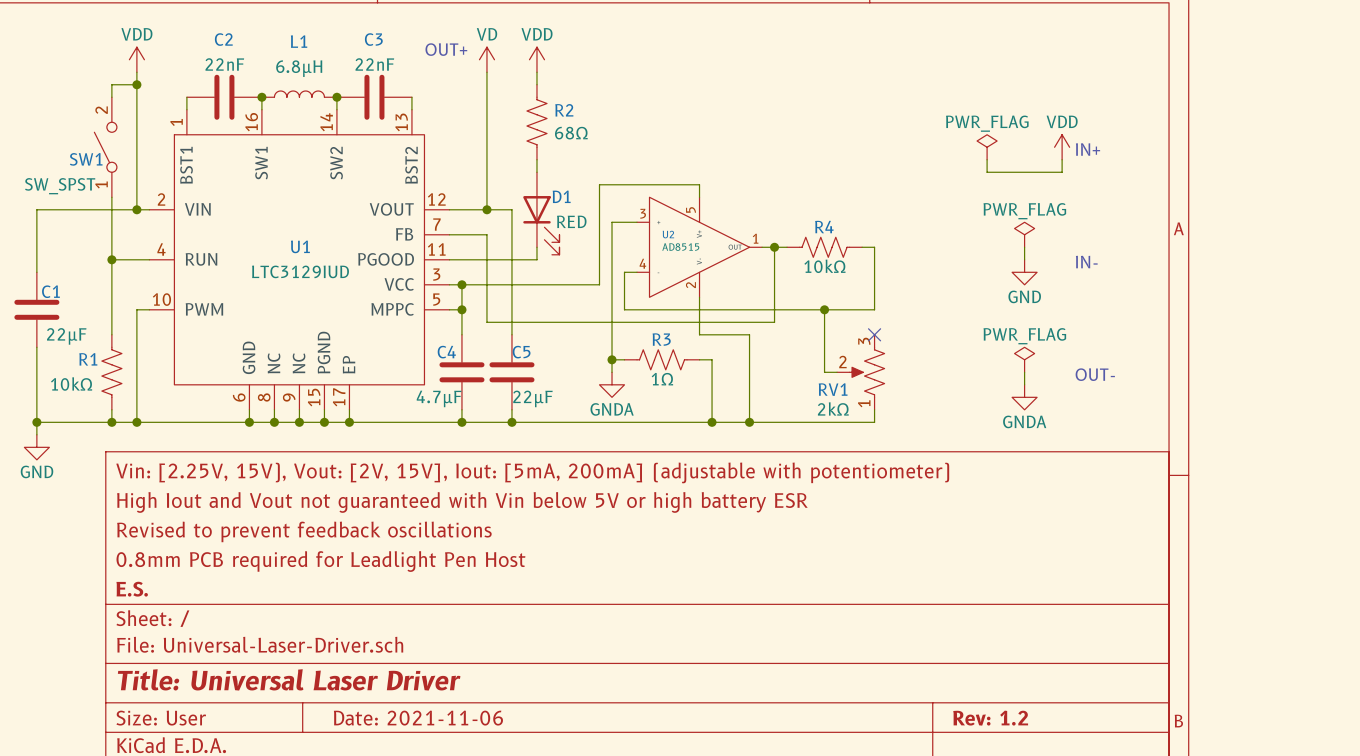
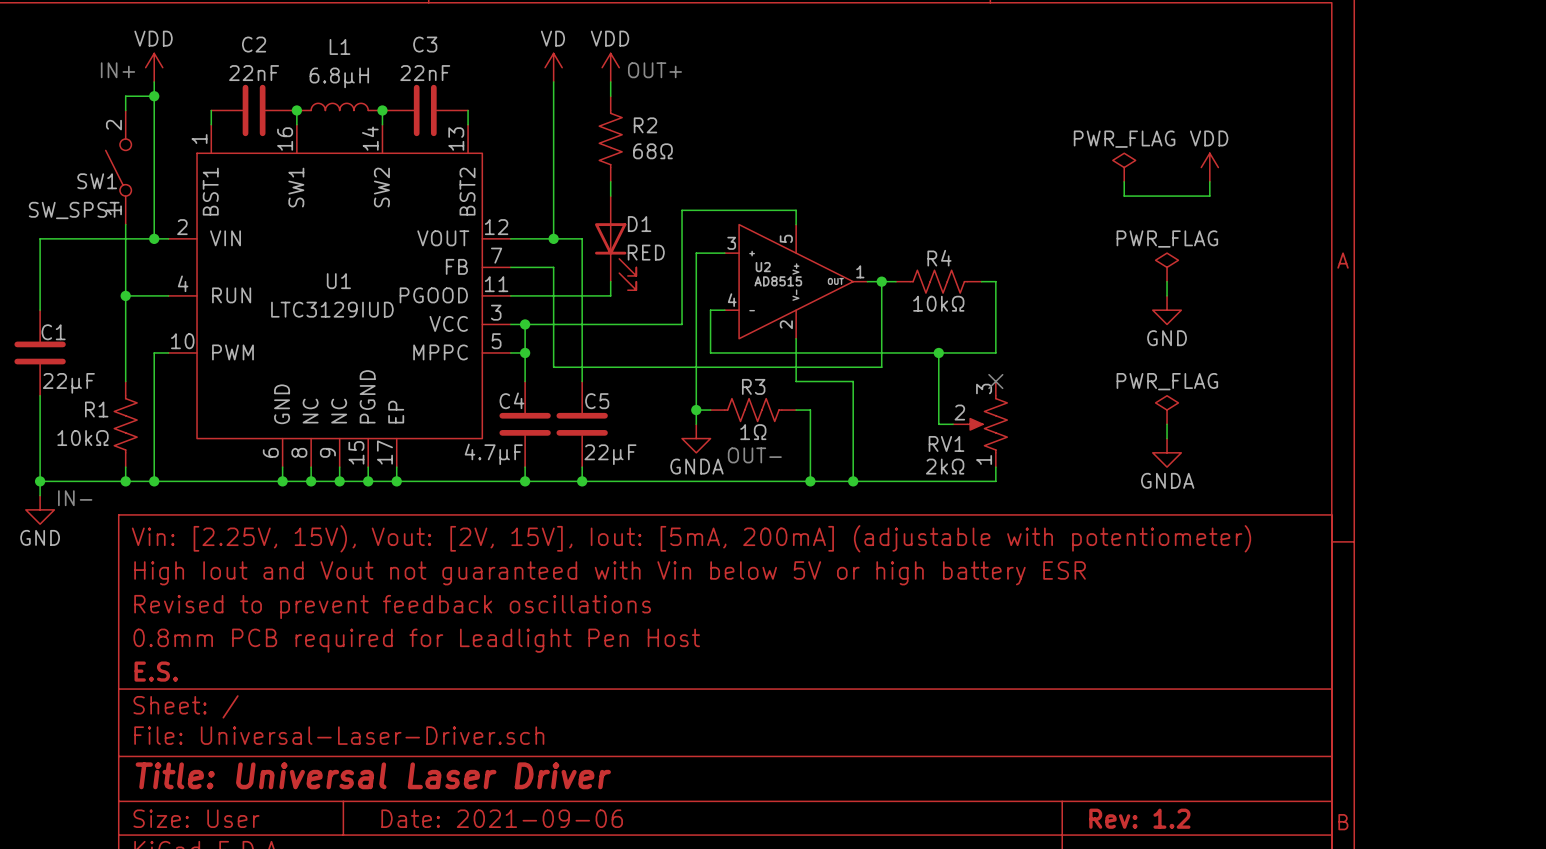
text position: OUT+ (446, 49) -> OUT+ (654, 70)
text: none -> IN+ (117, 70)
text: IN+ (1088, 149) -> none
text: IN- (1086, 262) -> none
text: OUT- (1095, 374) -> none
text: none -> OUT- (754, 455)
text: none -> IN- (75, 498)
title block: Date: 2021-11-06 (418, 718) -> Date: 2021-09-06 (502, 818)

